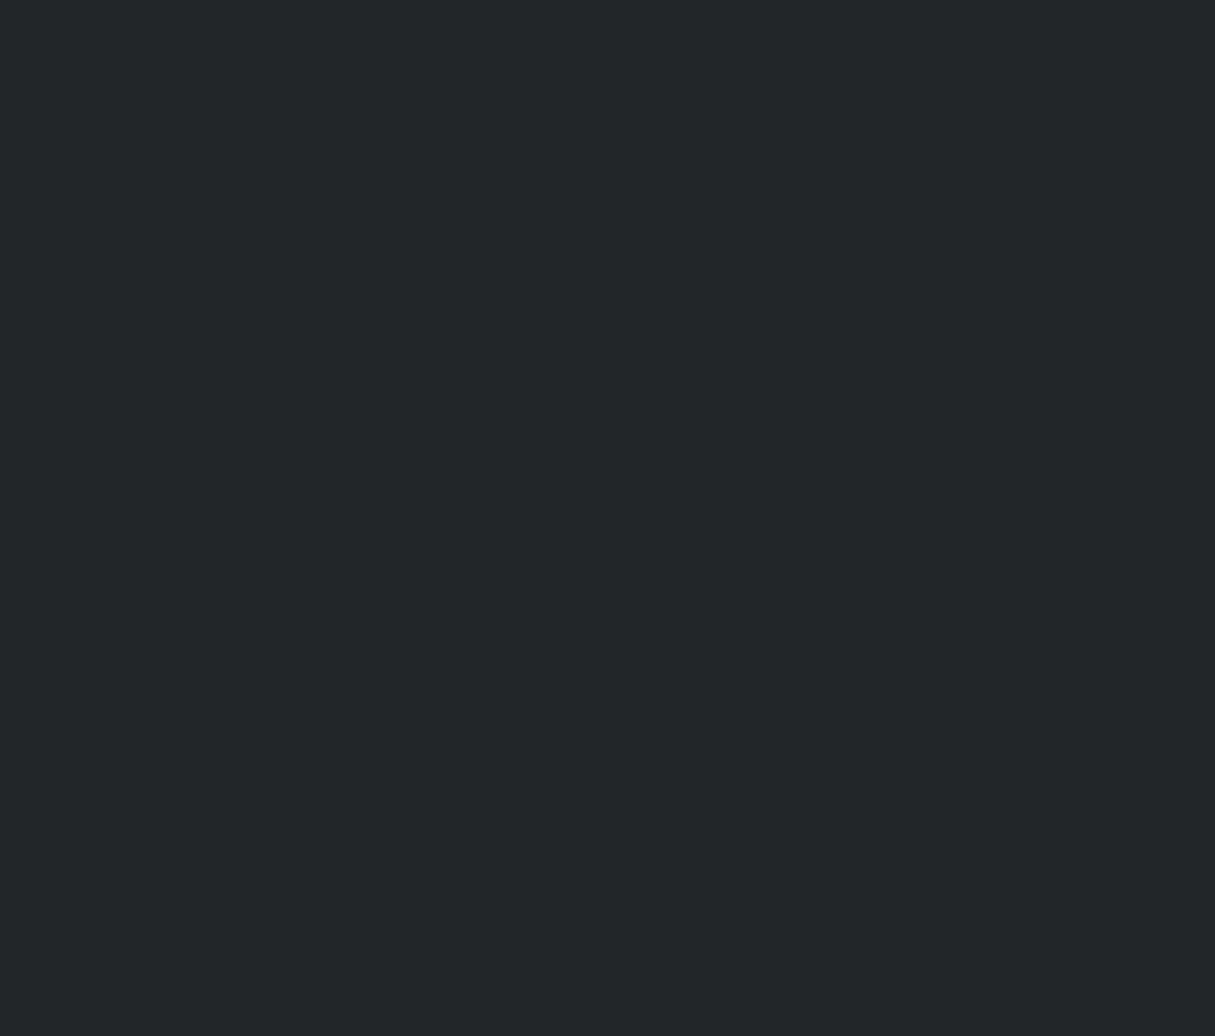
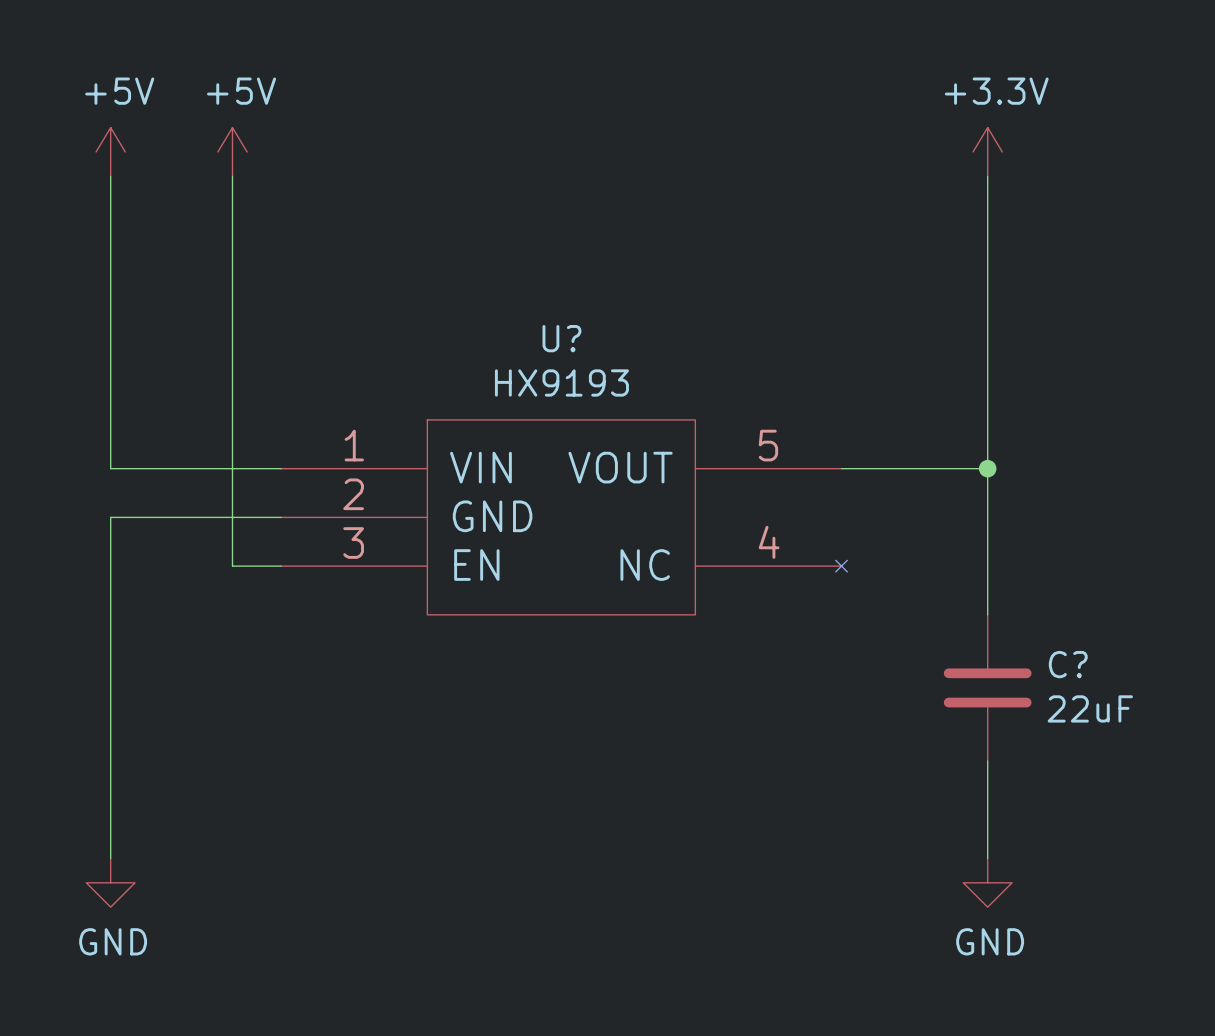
power symbol: none -> +5V (110, 151)
power symbol: none -> +5V (232, 151)
power symbol: none -> +3.3V (987, 151)
wire: none -> (110, 176) (110, 468) (281, 468)
wire: none -> (232, 176) (232, 566) (281, 566)
wire: none -> (987, 176) (987, 614)
wire: none -> (841, 468) (987, 468)
junction: none -> (987, 468)
wire: none -> (281, 517) (110, 517) (110, 858)
U?: none -> HX9193 (564, 517)
C?: none -> 22uF (987, 687)
wire: none -> (987, 761) (987, 858)
power symbol: none -> GND (110, 882)
power symbol: none -> GND (987, 882)

